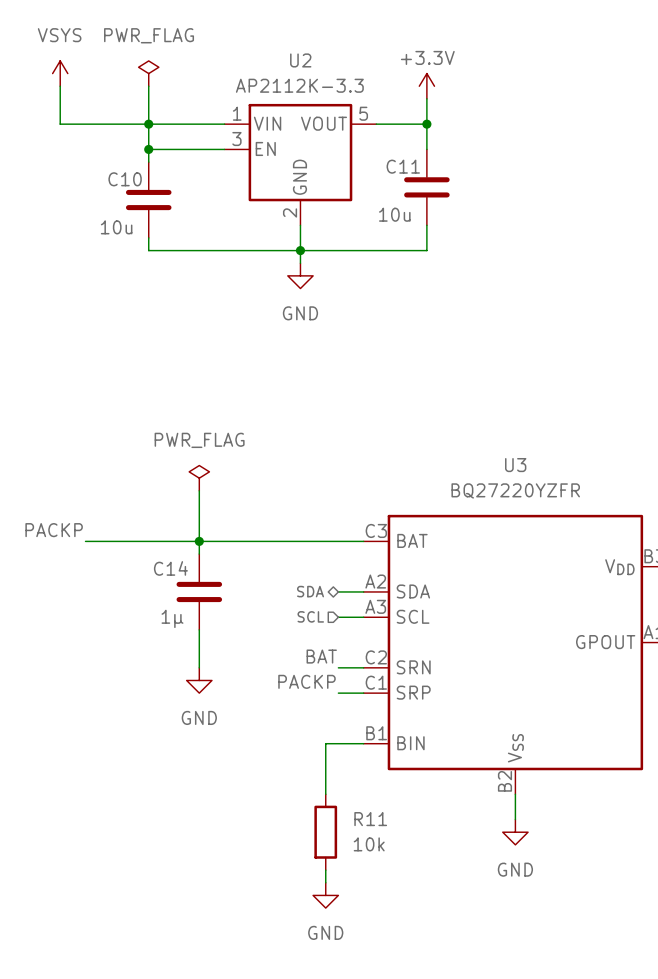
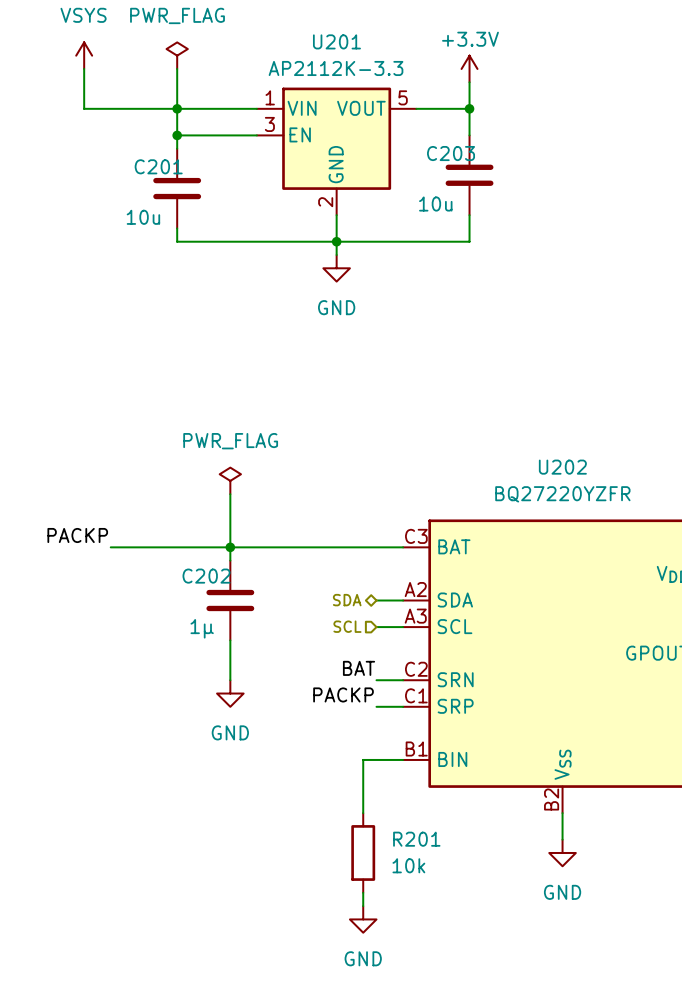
U2 name: U2 (300, 60) -> U201 (336, 41)
C11 name: C11 (403, 166) -> C203 (451, 153)
C10 name: C10 (125, 179) -> C201 (158, 166)
U3 name: U3 (515, 465) -> U202 (562, 467)
C14 name: C14 (170, 568) -> C202 (206, 576)
R11 name: R11 (370, 819) -> R201 (416, 839)

